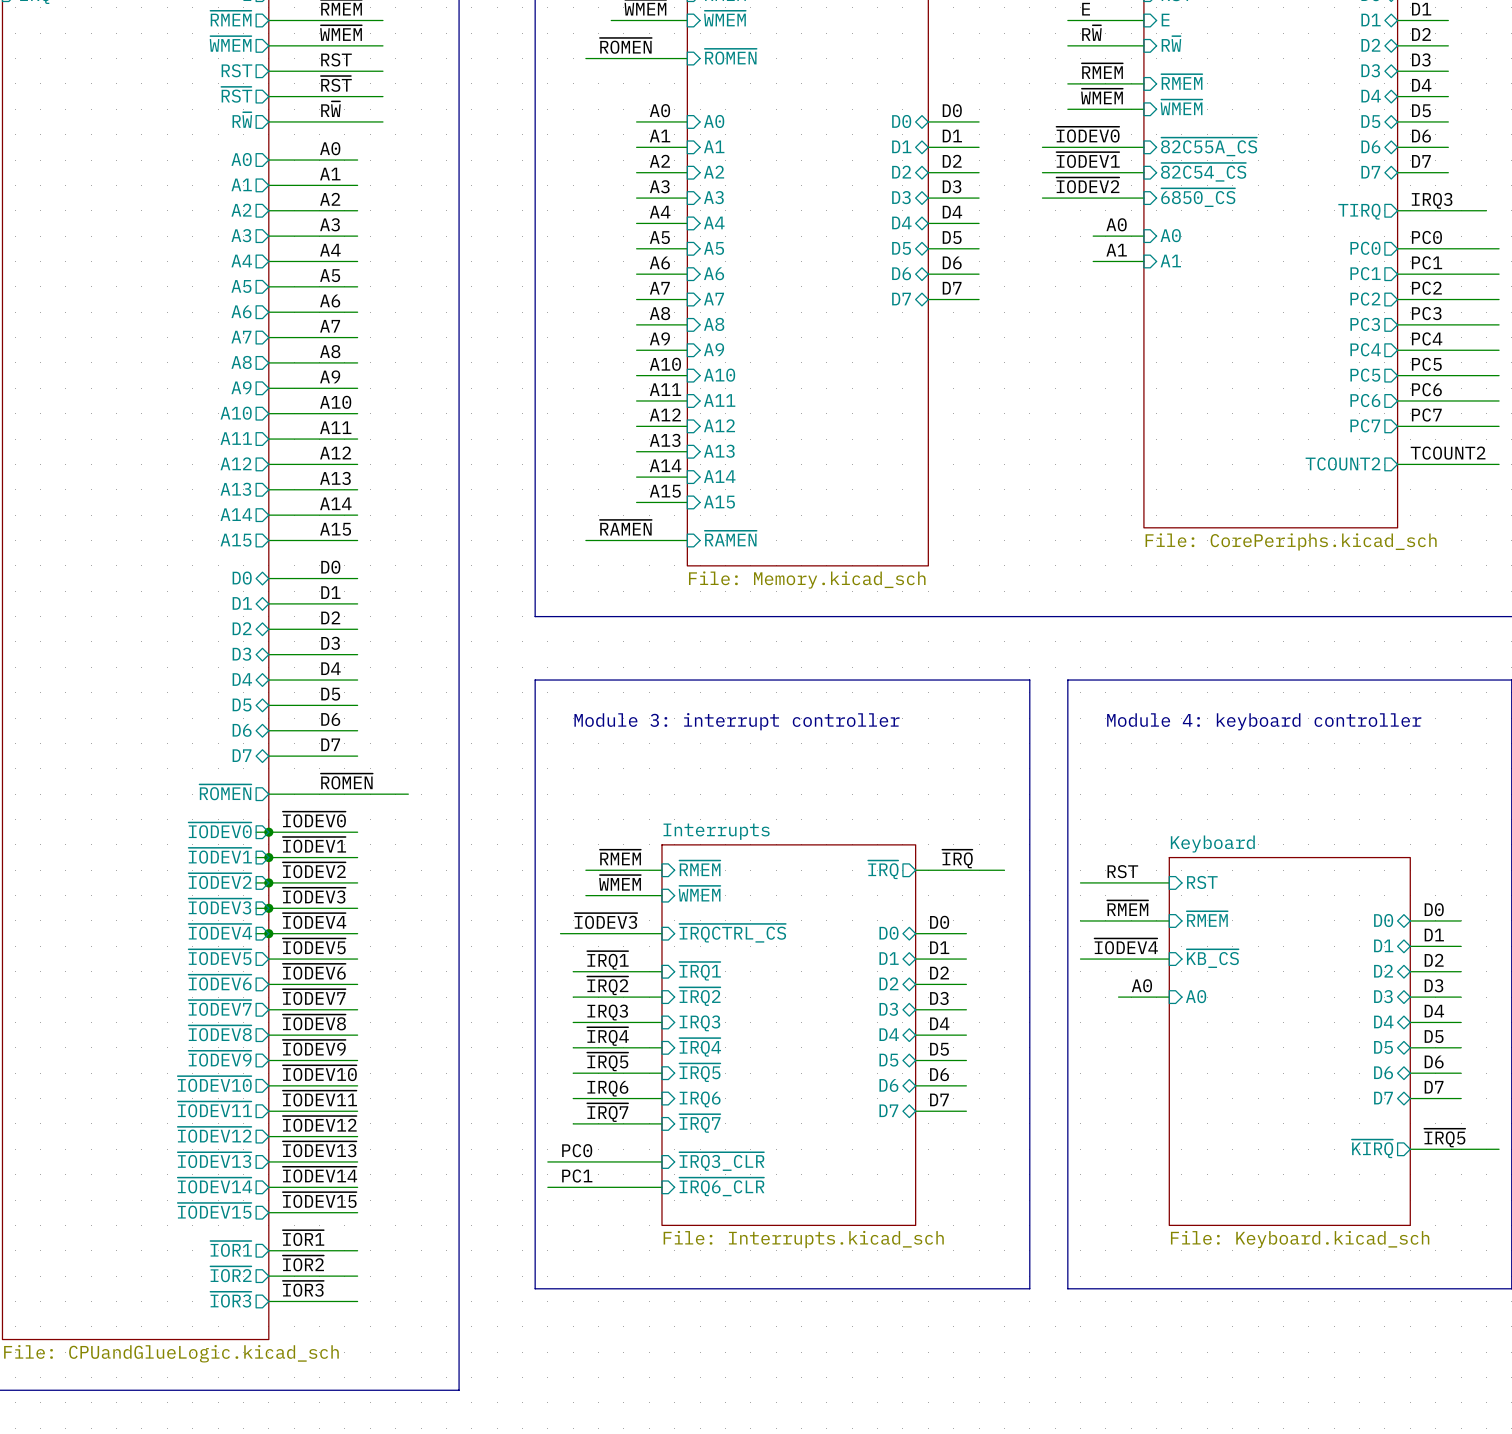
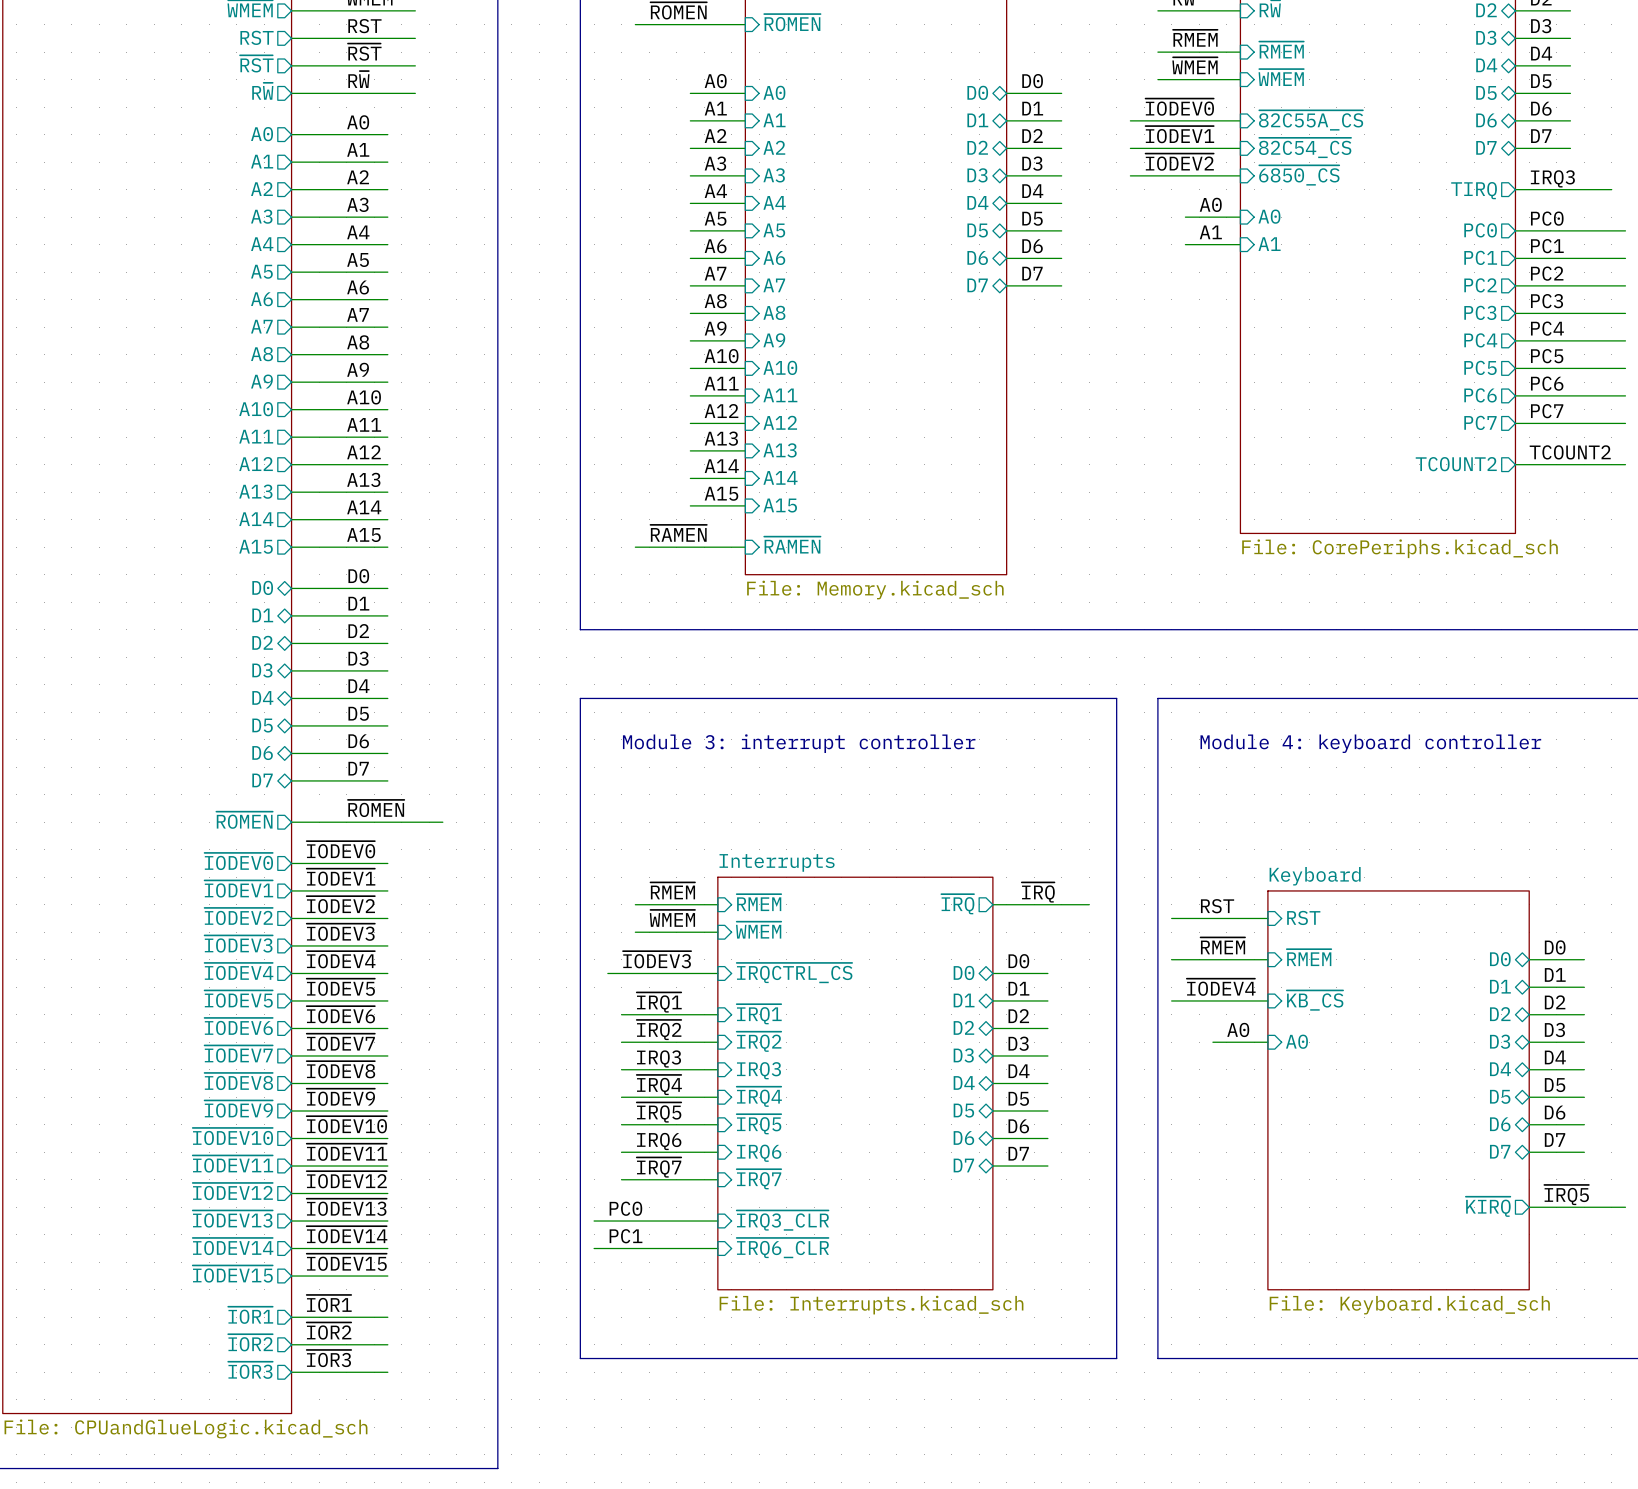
wire: (256, 832) (268, 832) -> none
junction: (268, 832) -> none
wire: (256, 857) (268, 857) -> none
junction: (268, 857) -> none
wire: (256, 882) (268, 882) -> none
junction: (268, 882) -> none
wire: (256, 908) (268, 908) -> none
junction: (268, 908) -> none
wire: (256, 933) (268, 933) -> none
junction: (268, 933) -> none

